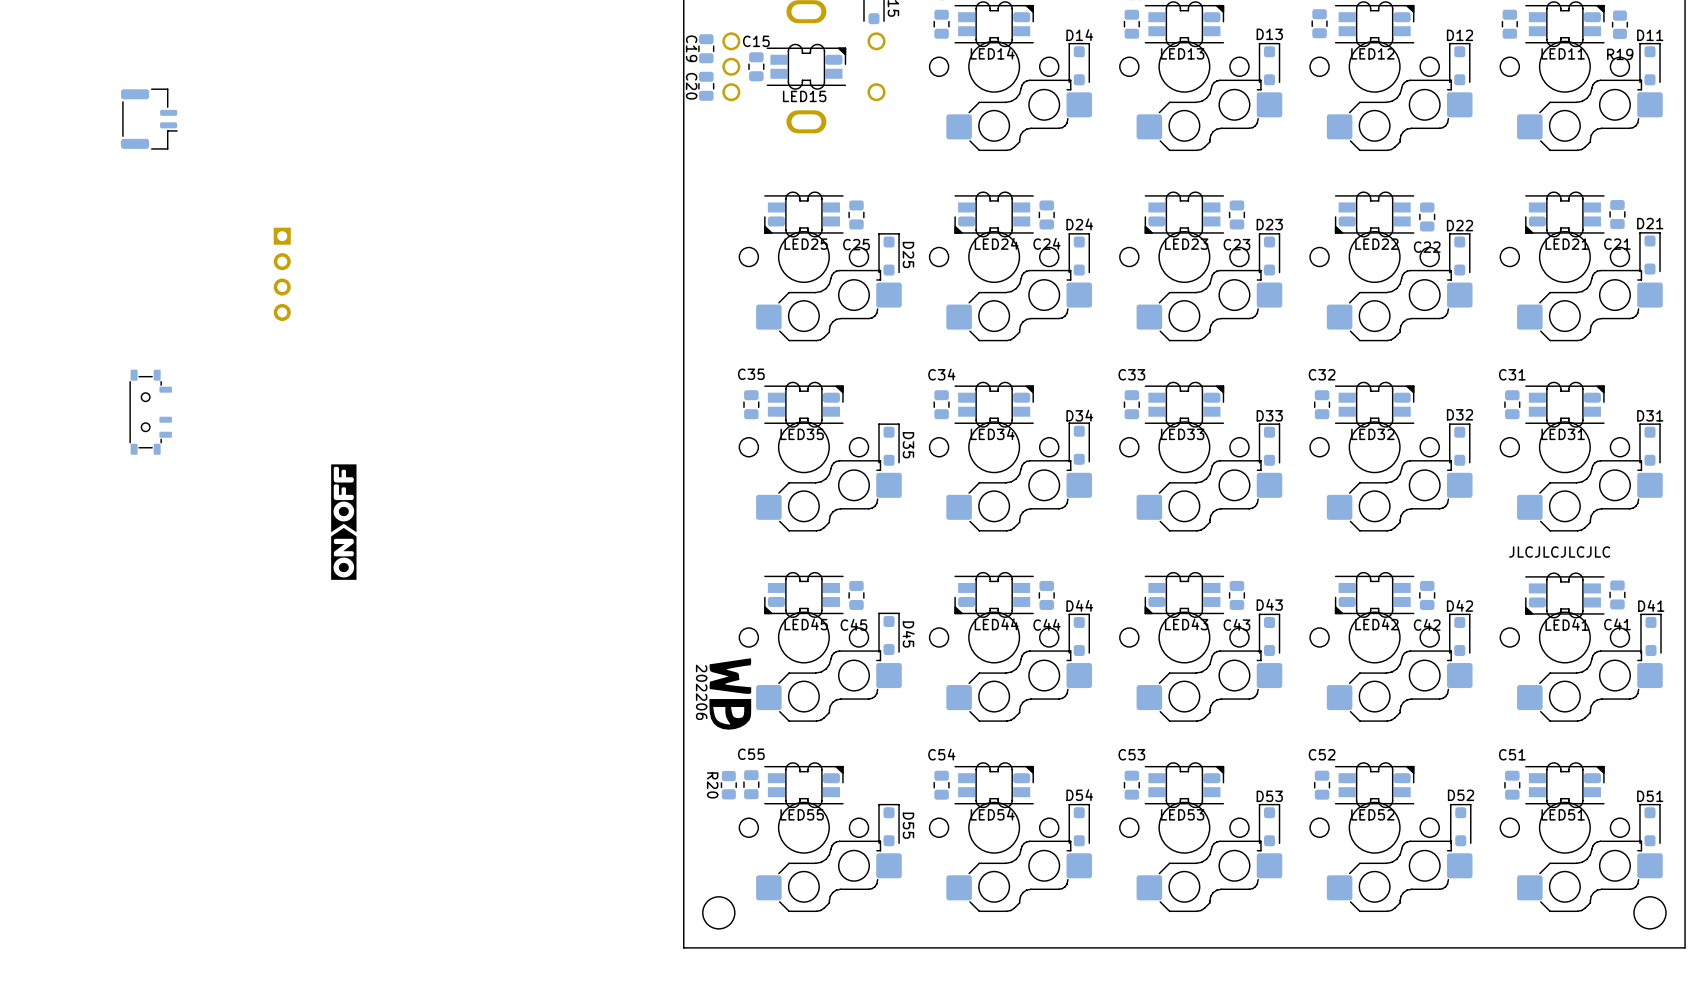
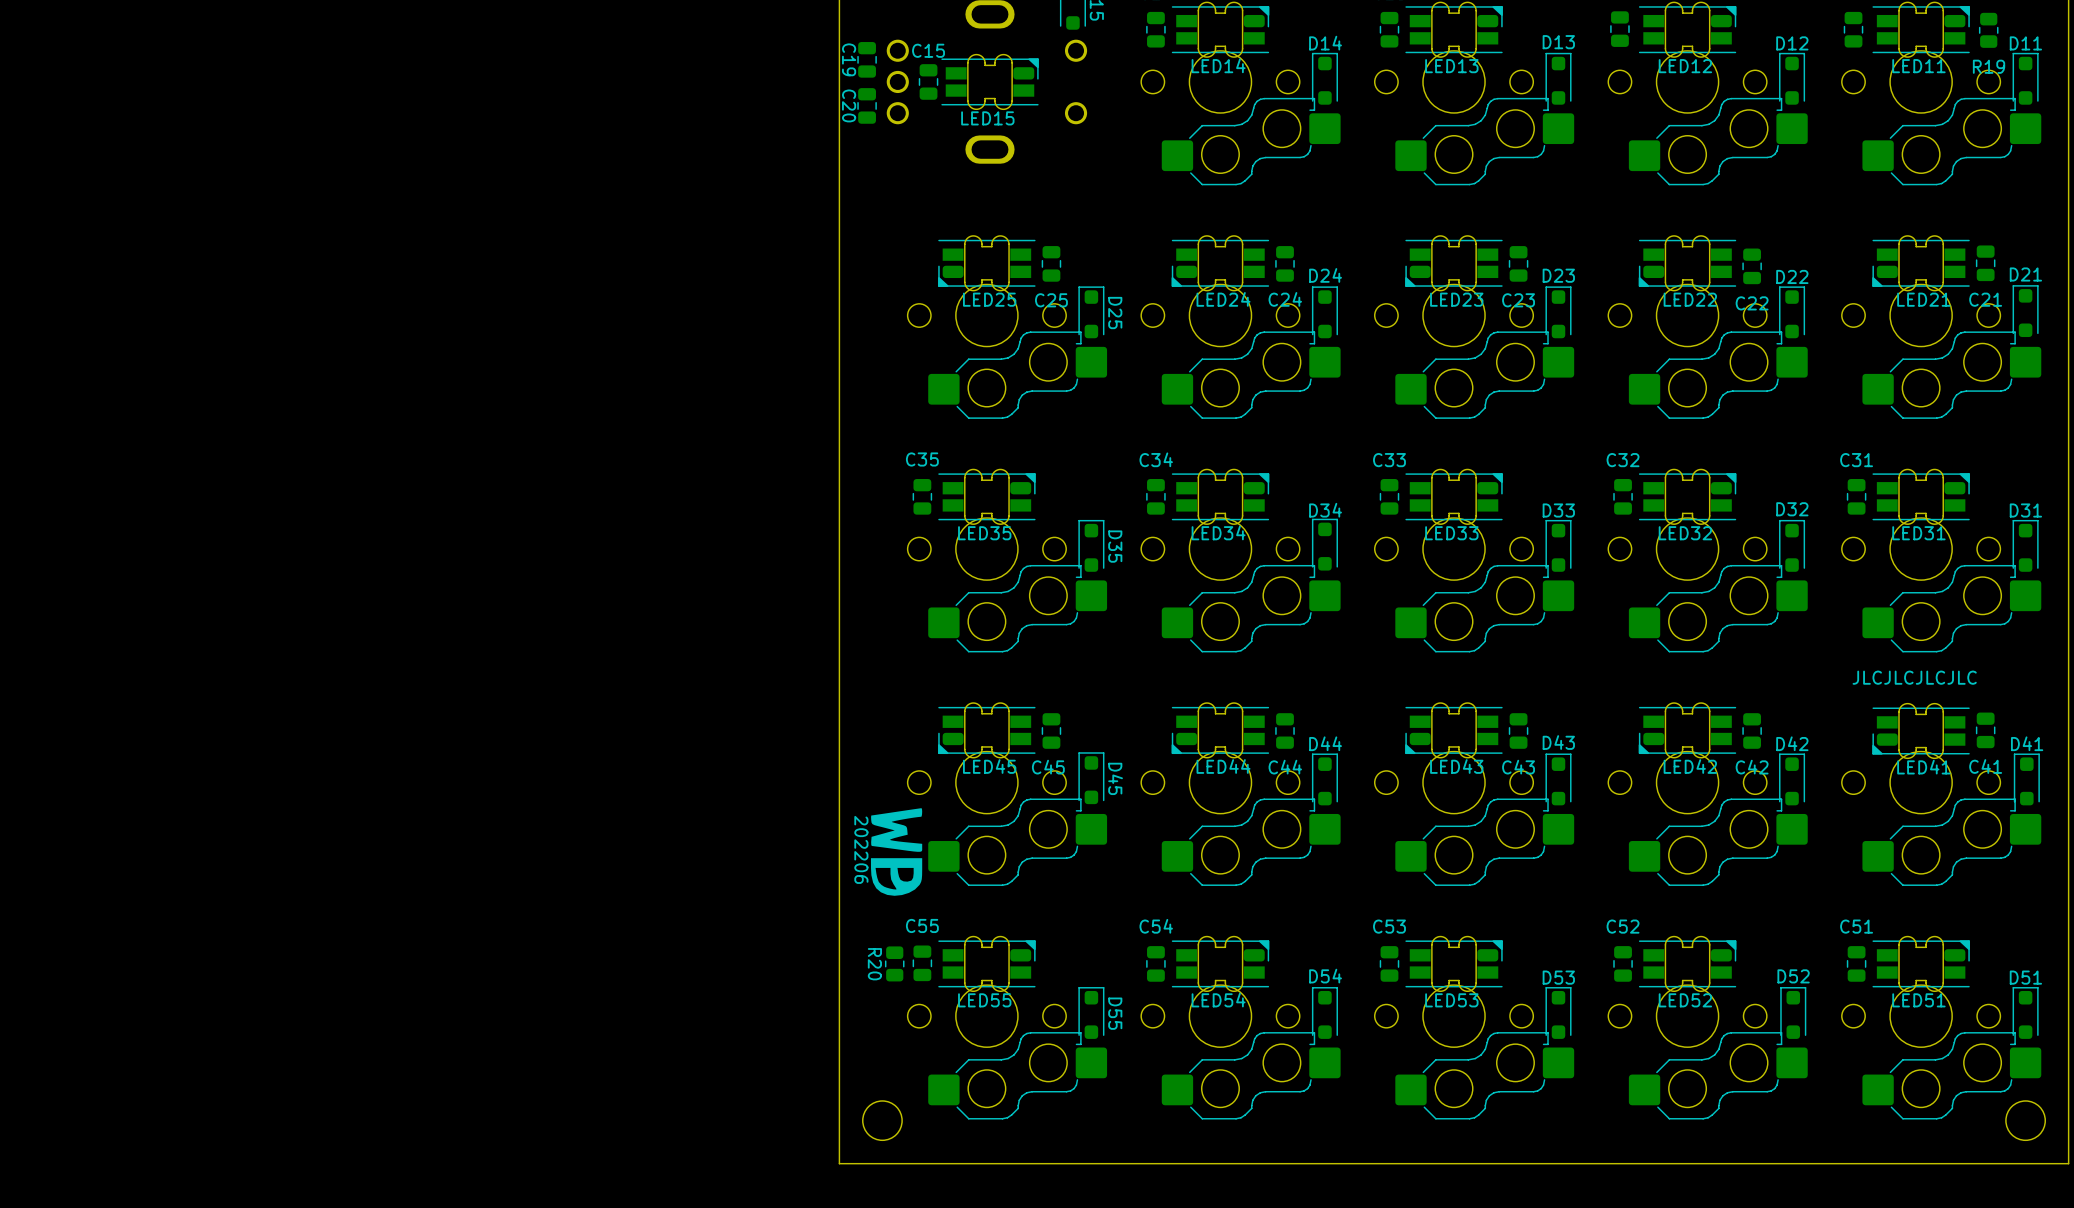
part: (149, 119) -> none
part: (282, 274) -> none
part: (150, 412) -> none
drawing: [331, 464, 357, 580] -> none

